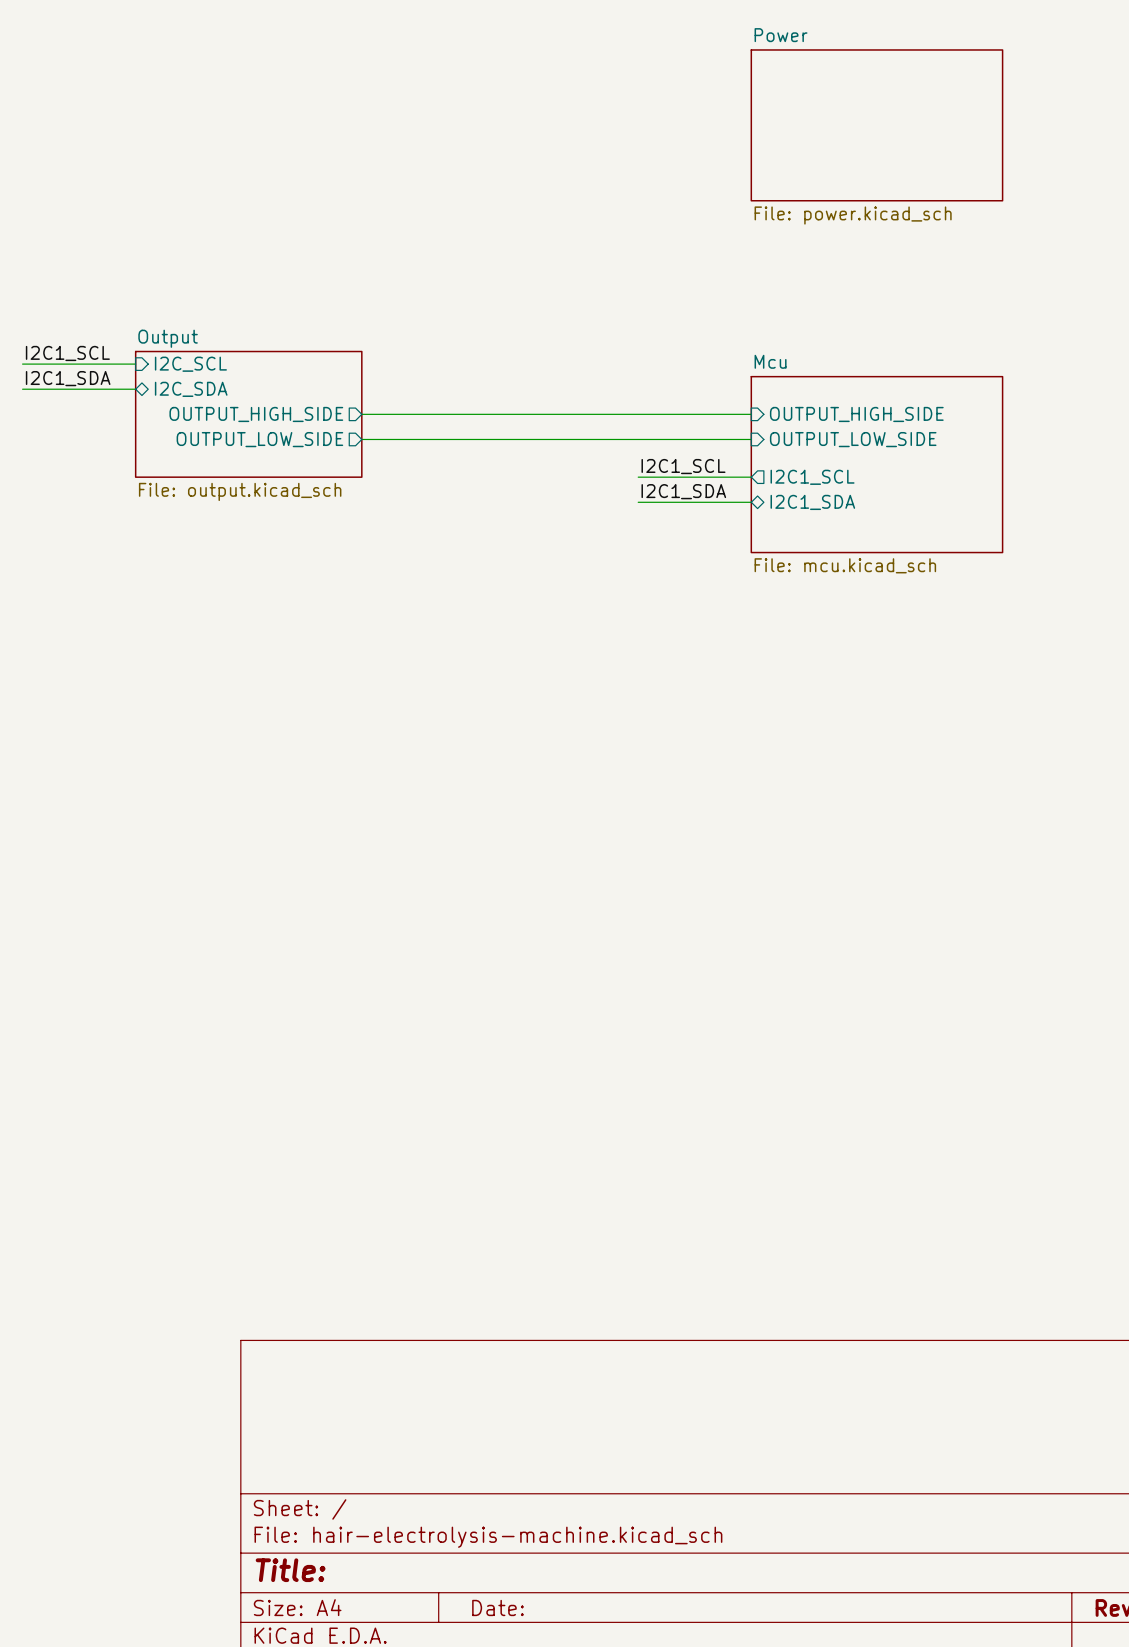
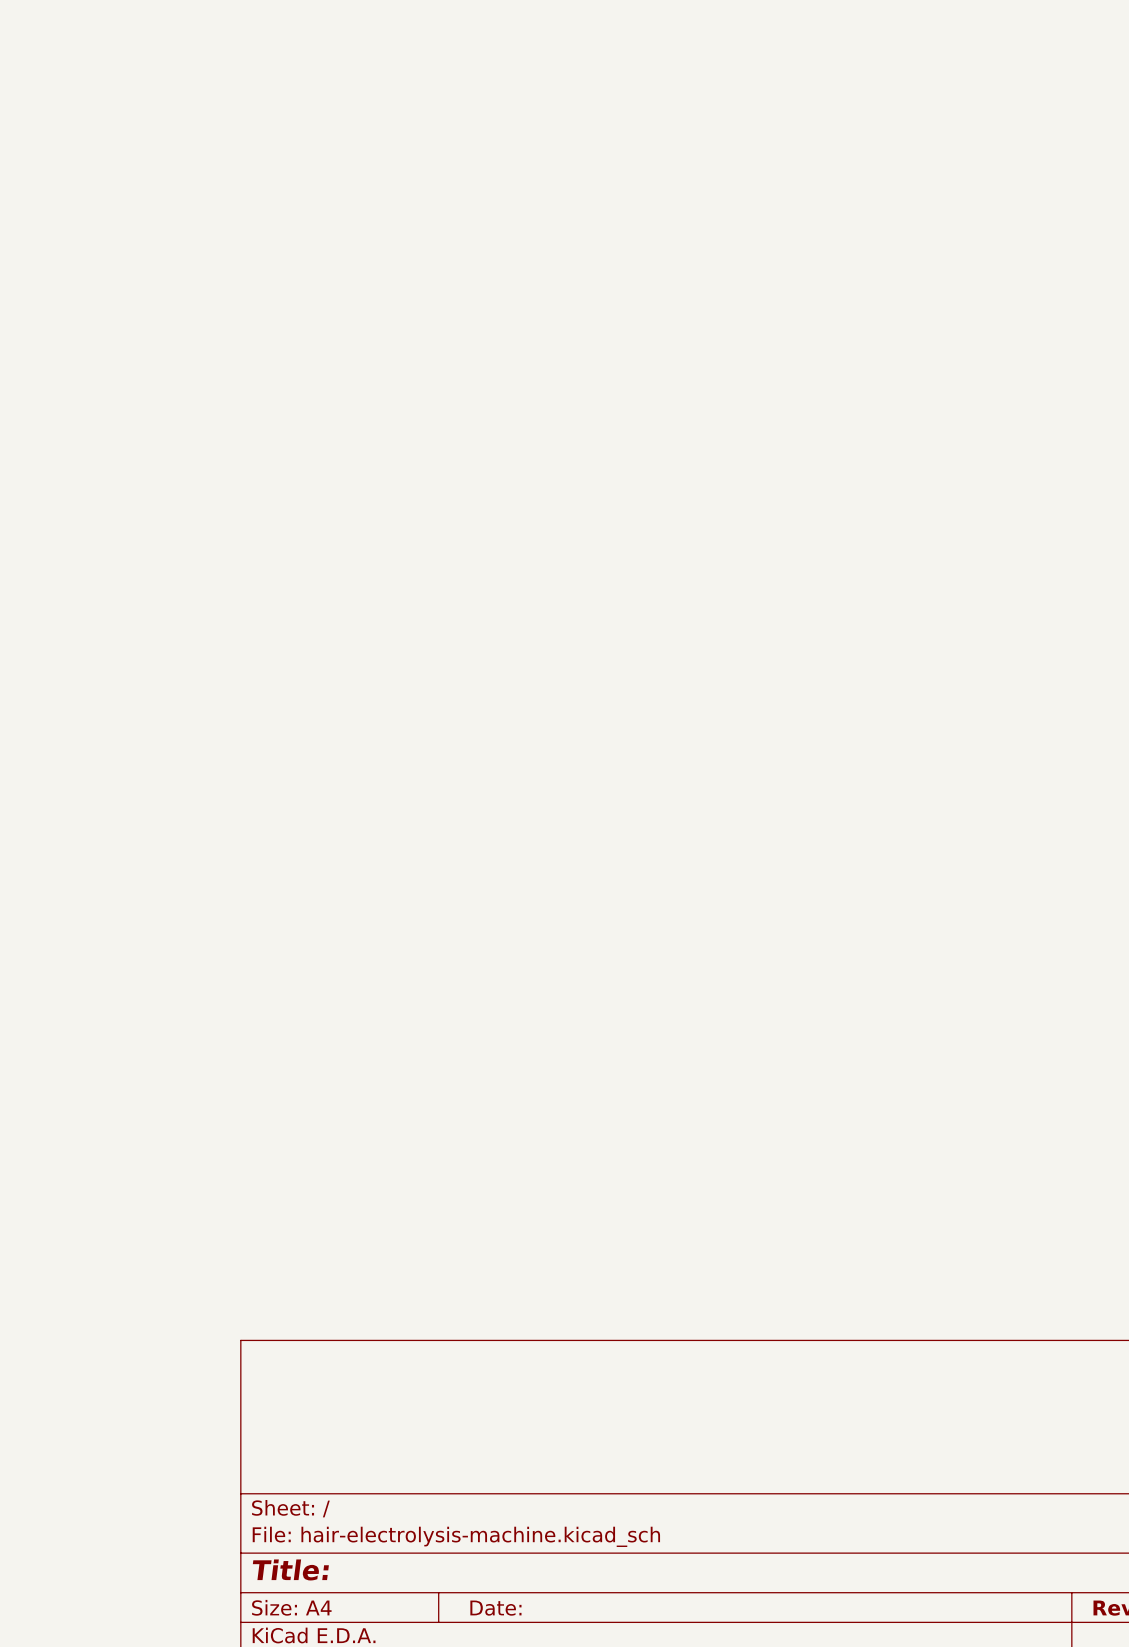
sheet Power: File: power.kicad_sch (876, 125) -> none
label: I2C1_SCL (67, 353) -> none
wire: (22, 364) (135, 364) -> none
sheet pin: I2C_SCL (190, 364) -> none
label: I2C1_SDA (68, 378) -> none
wire: (22, 389) (135, 389) -> none
sheet pin: I2C_SDA (191, 389) -> none
sheet Output: File: output.kicad_sch (248, 414) -> none
sheet pin: OUTPUT_HIGH_SIDE (256, 414) -> none
wire: (361, 414) (751, 414) -> none
sheet pin: OUTPUT_HIGH_SIDE (856, 414) -> none
sheet pin: OUTPUT_LOW_SIDE (259, 439) -> none
wire: (361, 439) (751, 439) -> none
sheet pin: OUTPUT_LOW_SIDE (853, 439) -> none
sheet Mcu: File: mcu.kicad_sch (876, 464) -> none
label: I2C1_SCL (683, 466) -> none
wire: (638, 477) (751, 477) -> none
sheet pin: I2C1_SCL (812, 477) -> none
label: I2C1_SDA (683, 491) -> none
wire: (638, 502) (751, 502) -> none
sheet pin: I2C1_SDA (812, 502) -> none

